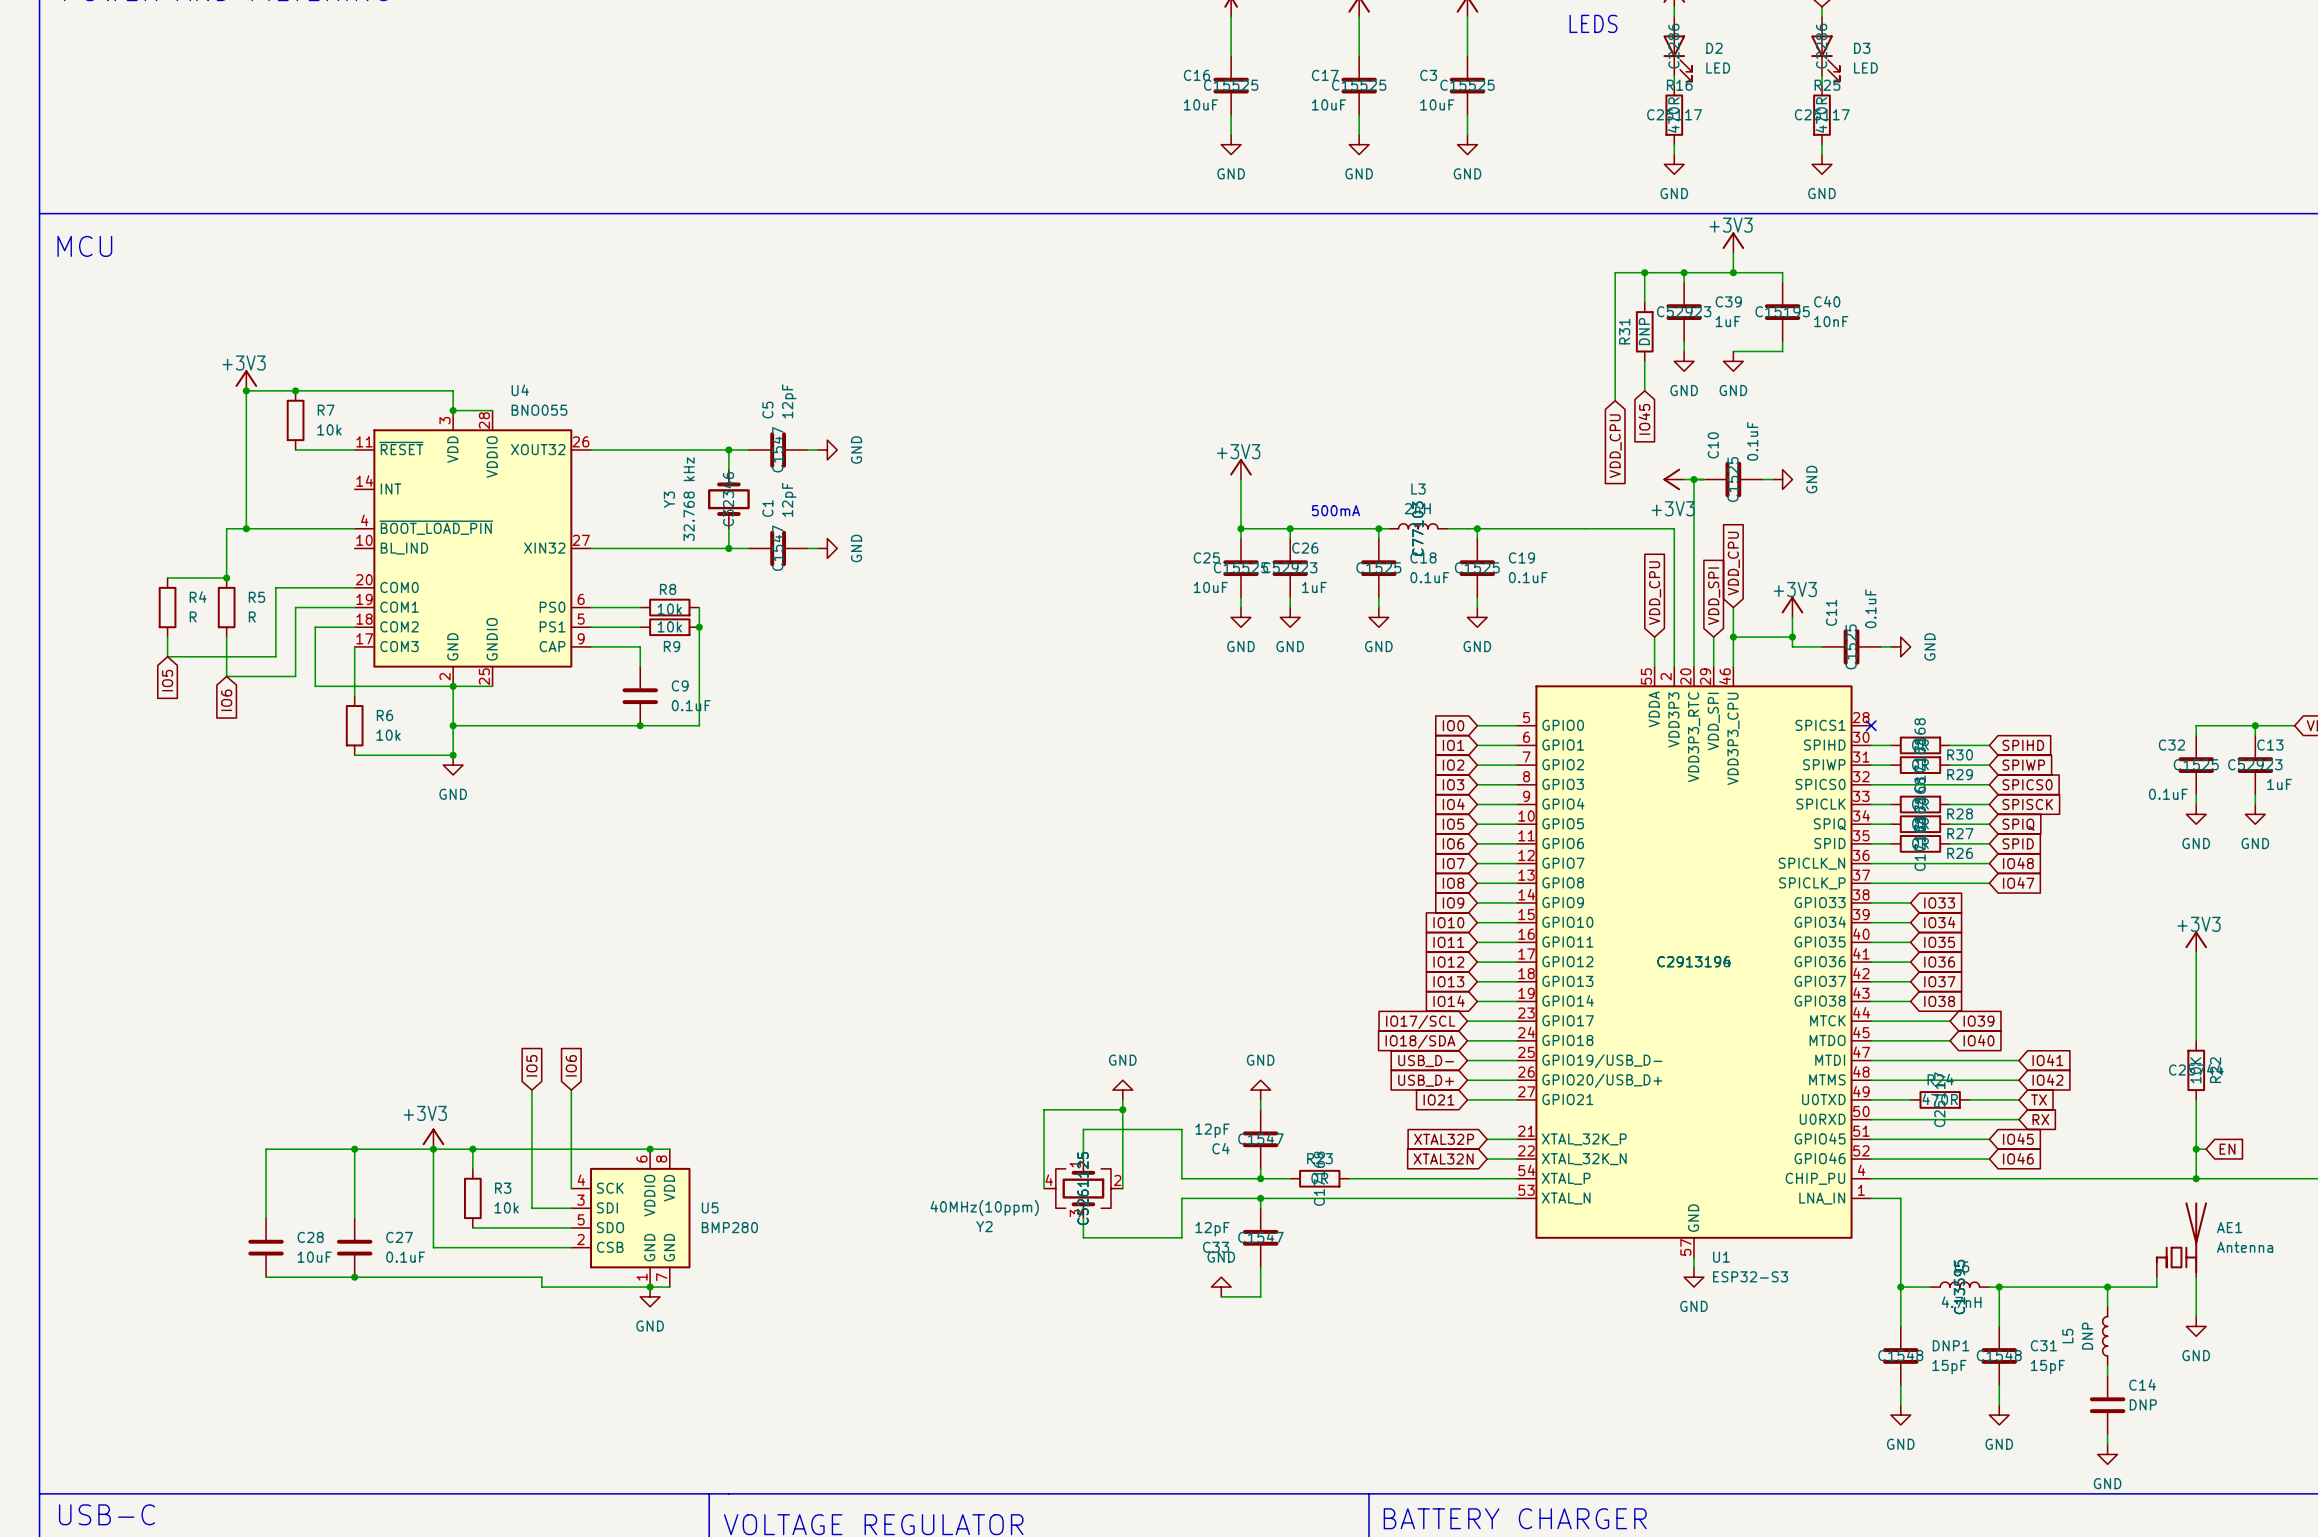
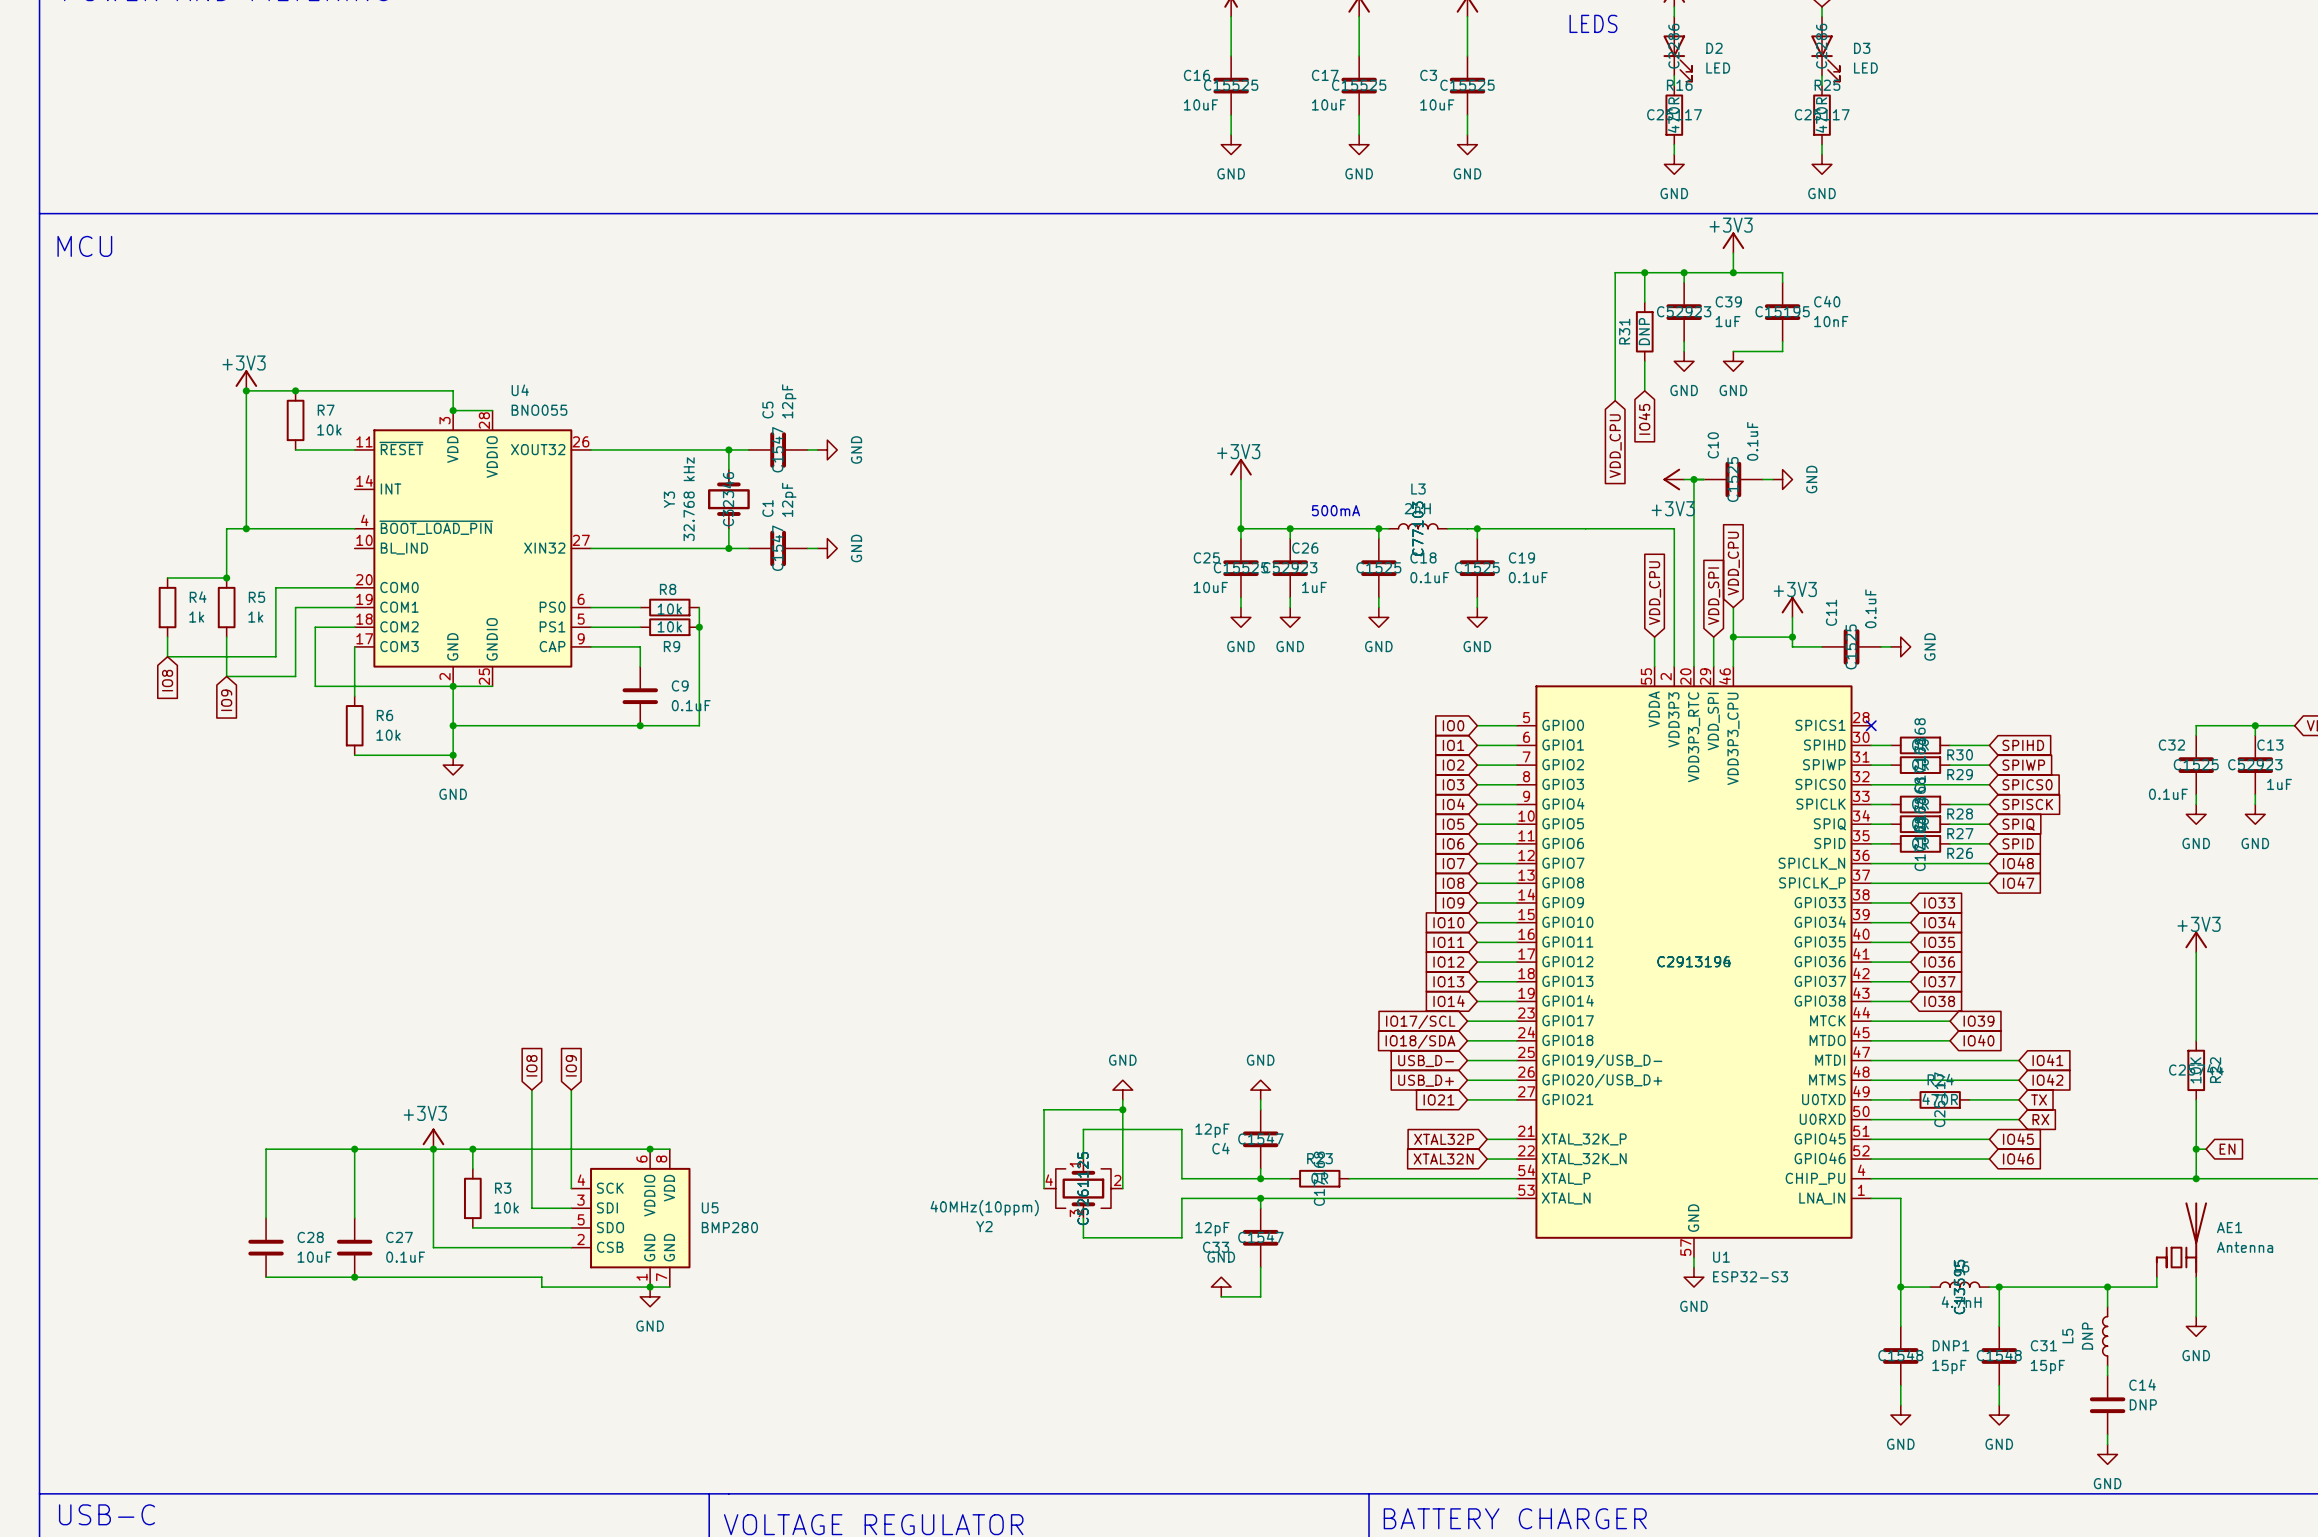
R4 value: R (193, 617) -> 1k (196, 617)
R5 value: R (252, 617) -> 1k (255, 617)
global label: IO5 (167, 680) -> IO8 (167, 680)
global label: IO6 (226, 700) -> IO9 (226, 700)
global label: IO5 (531, 1065) -> IO8 (531, 1065)
global label: IO6 (571, 1065) -> IO9 (571, 1065)

